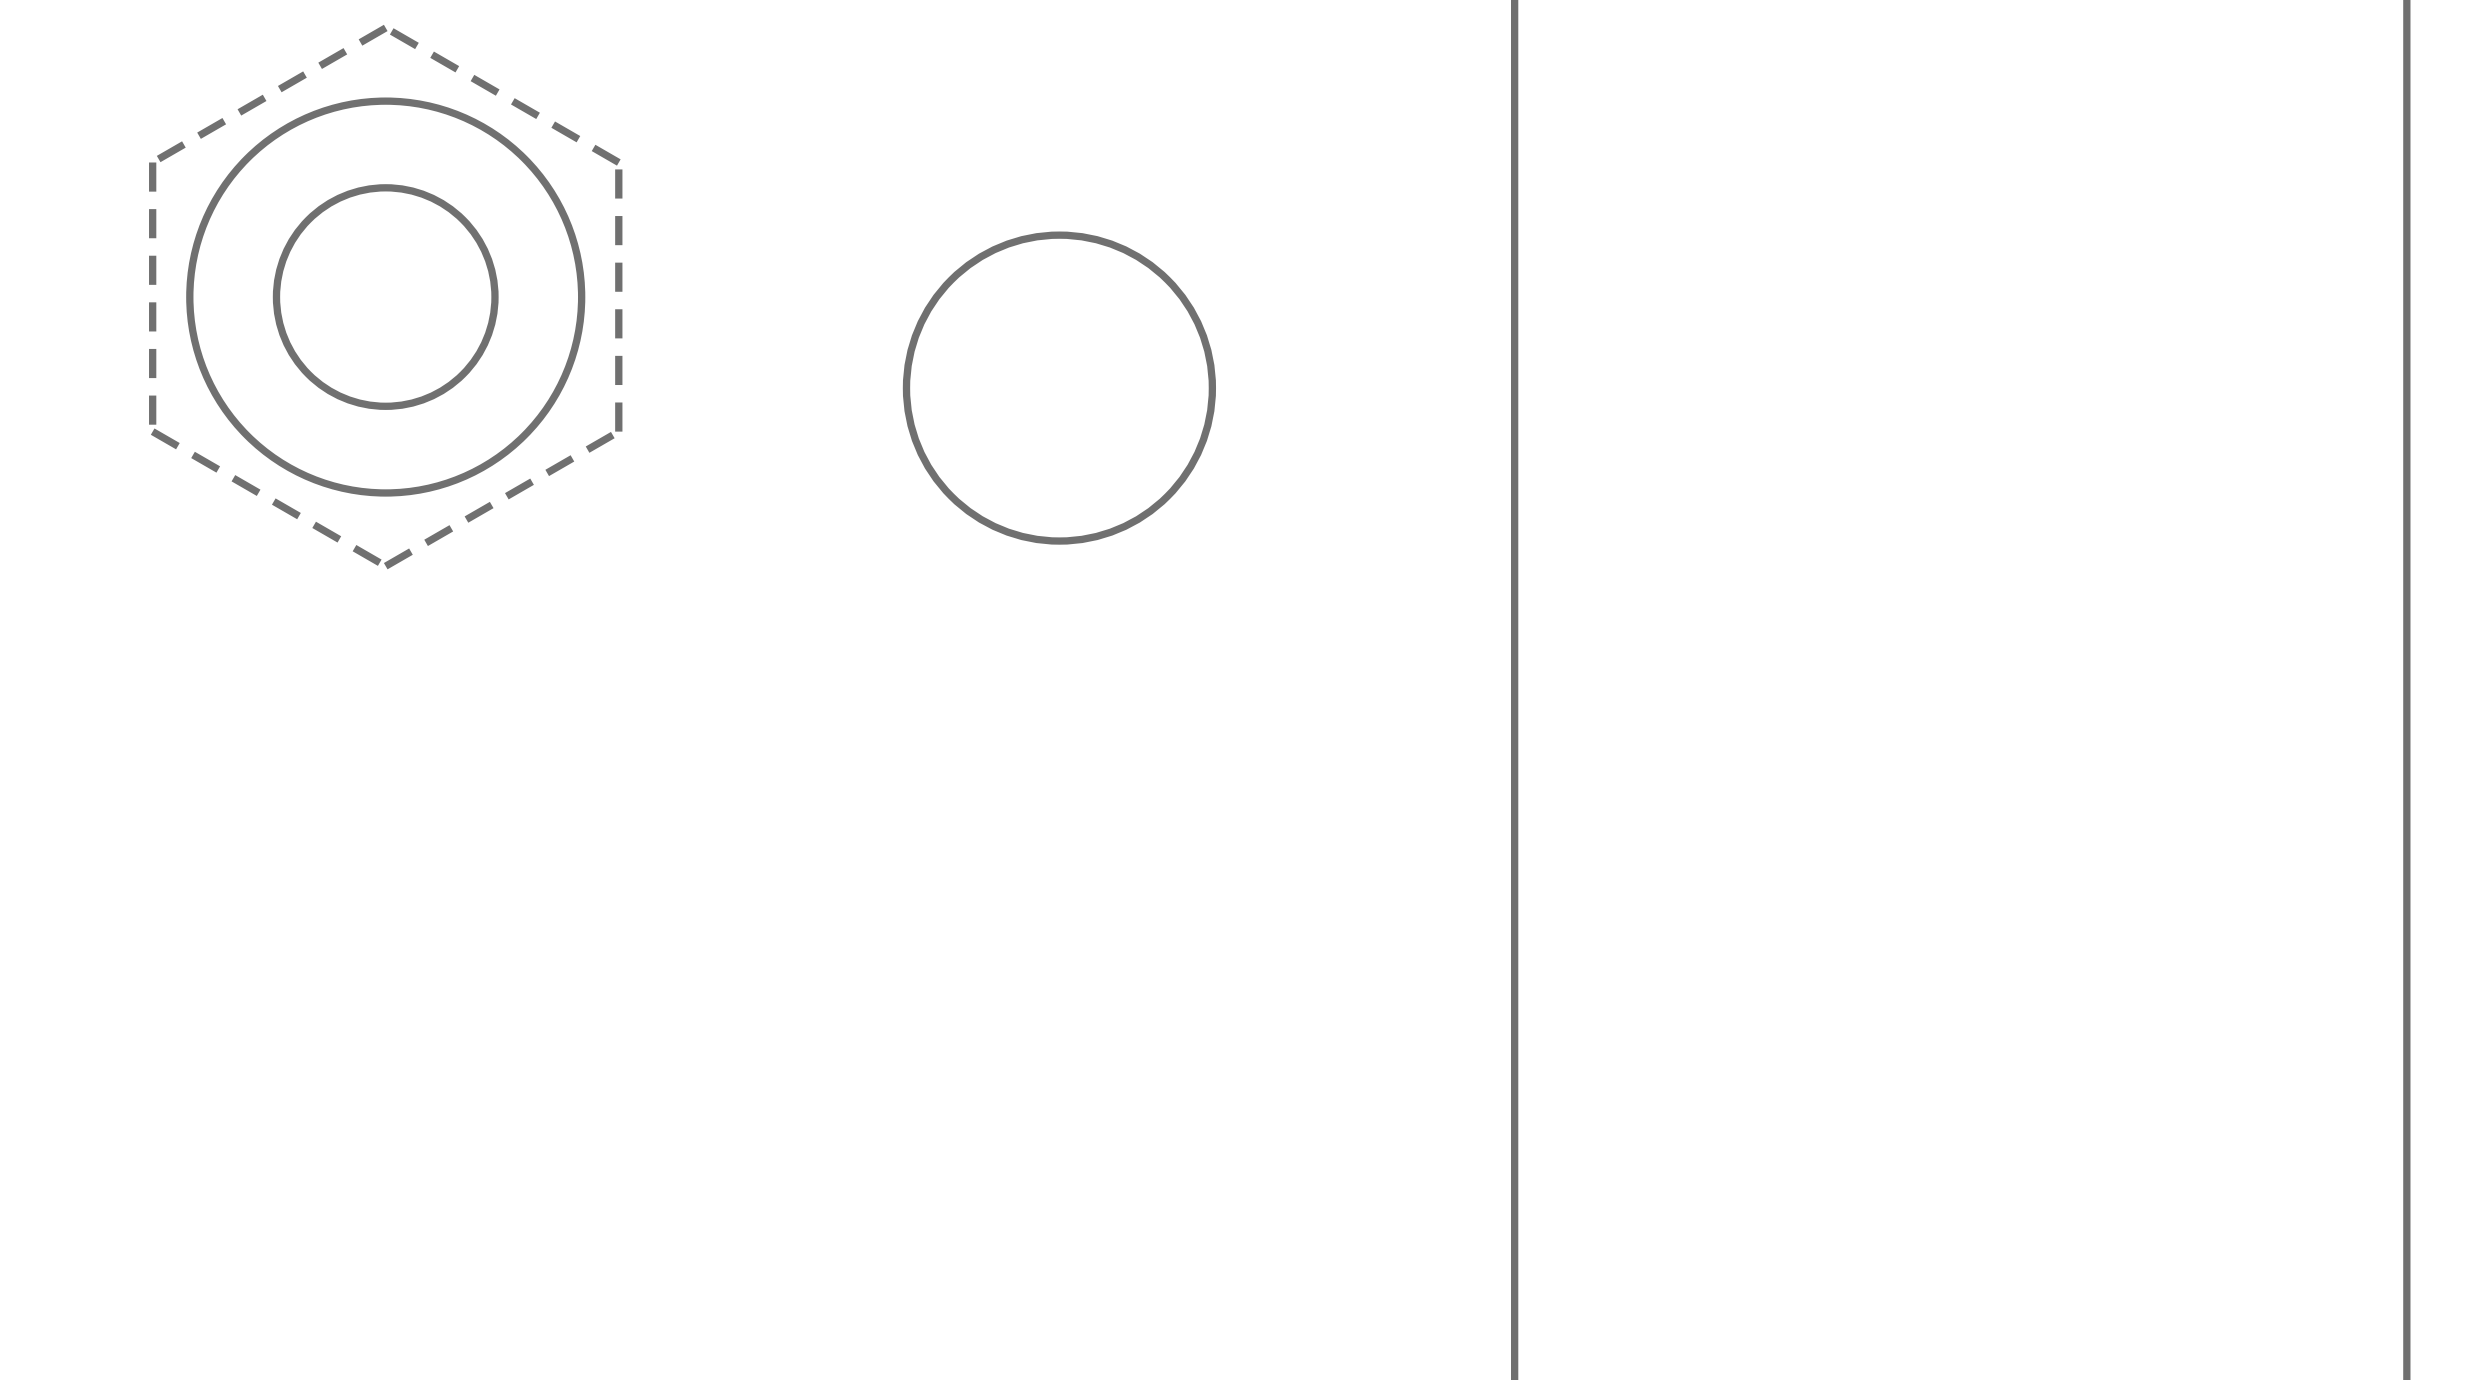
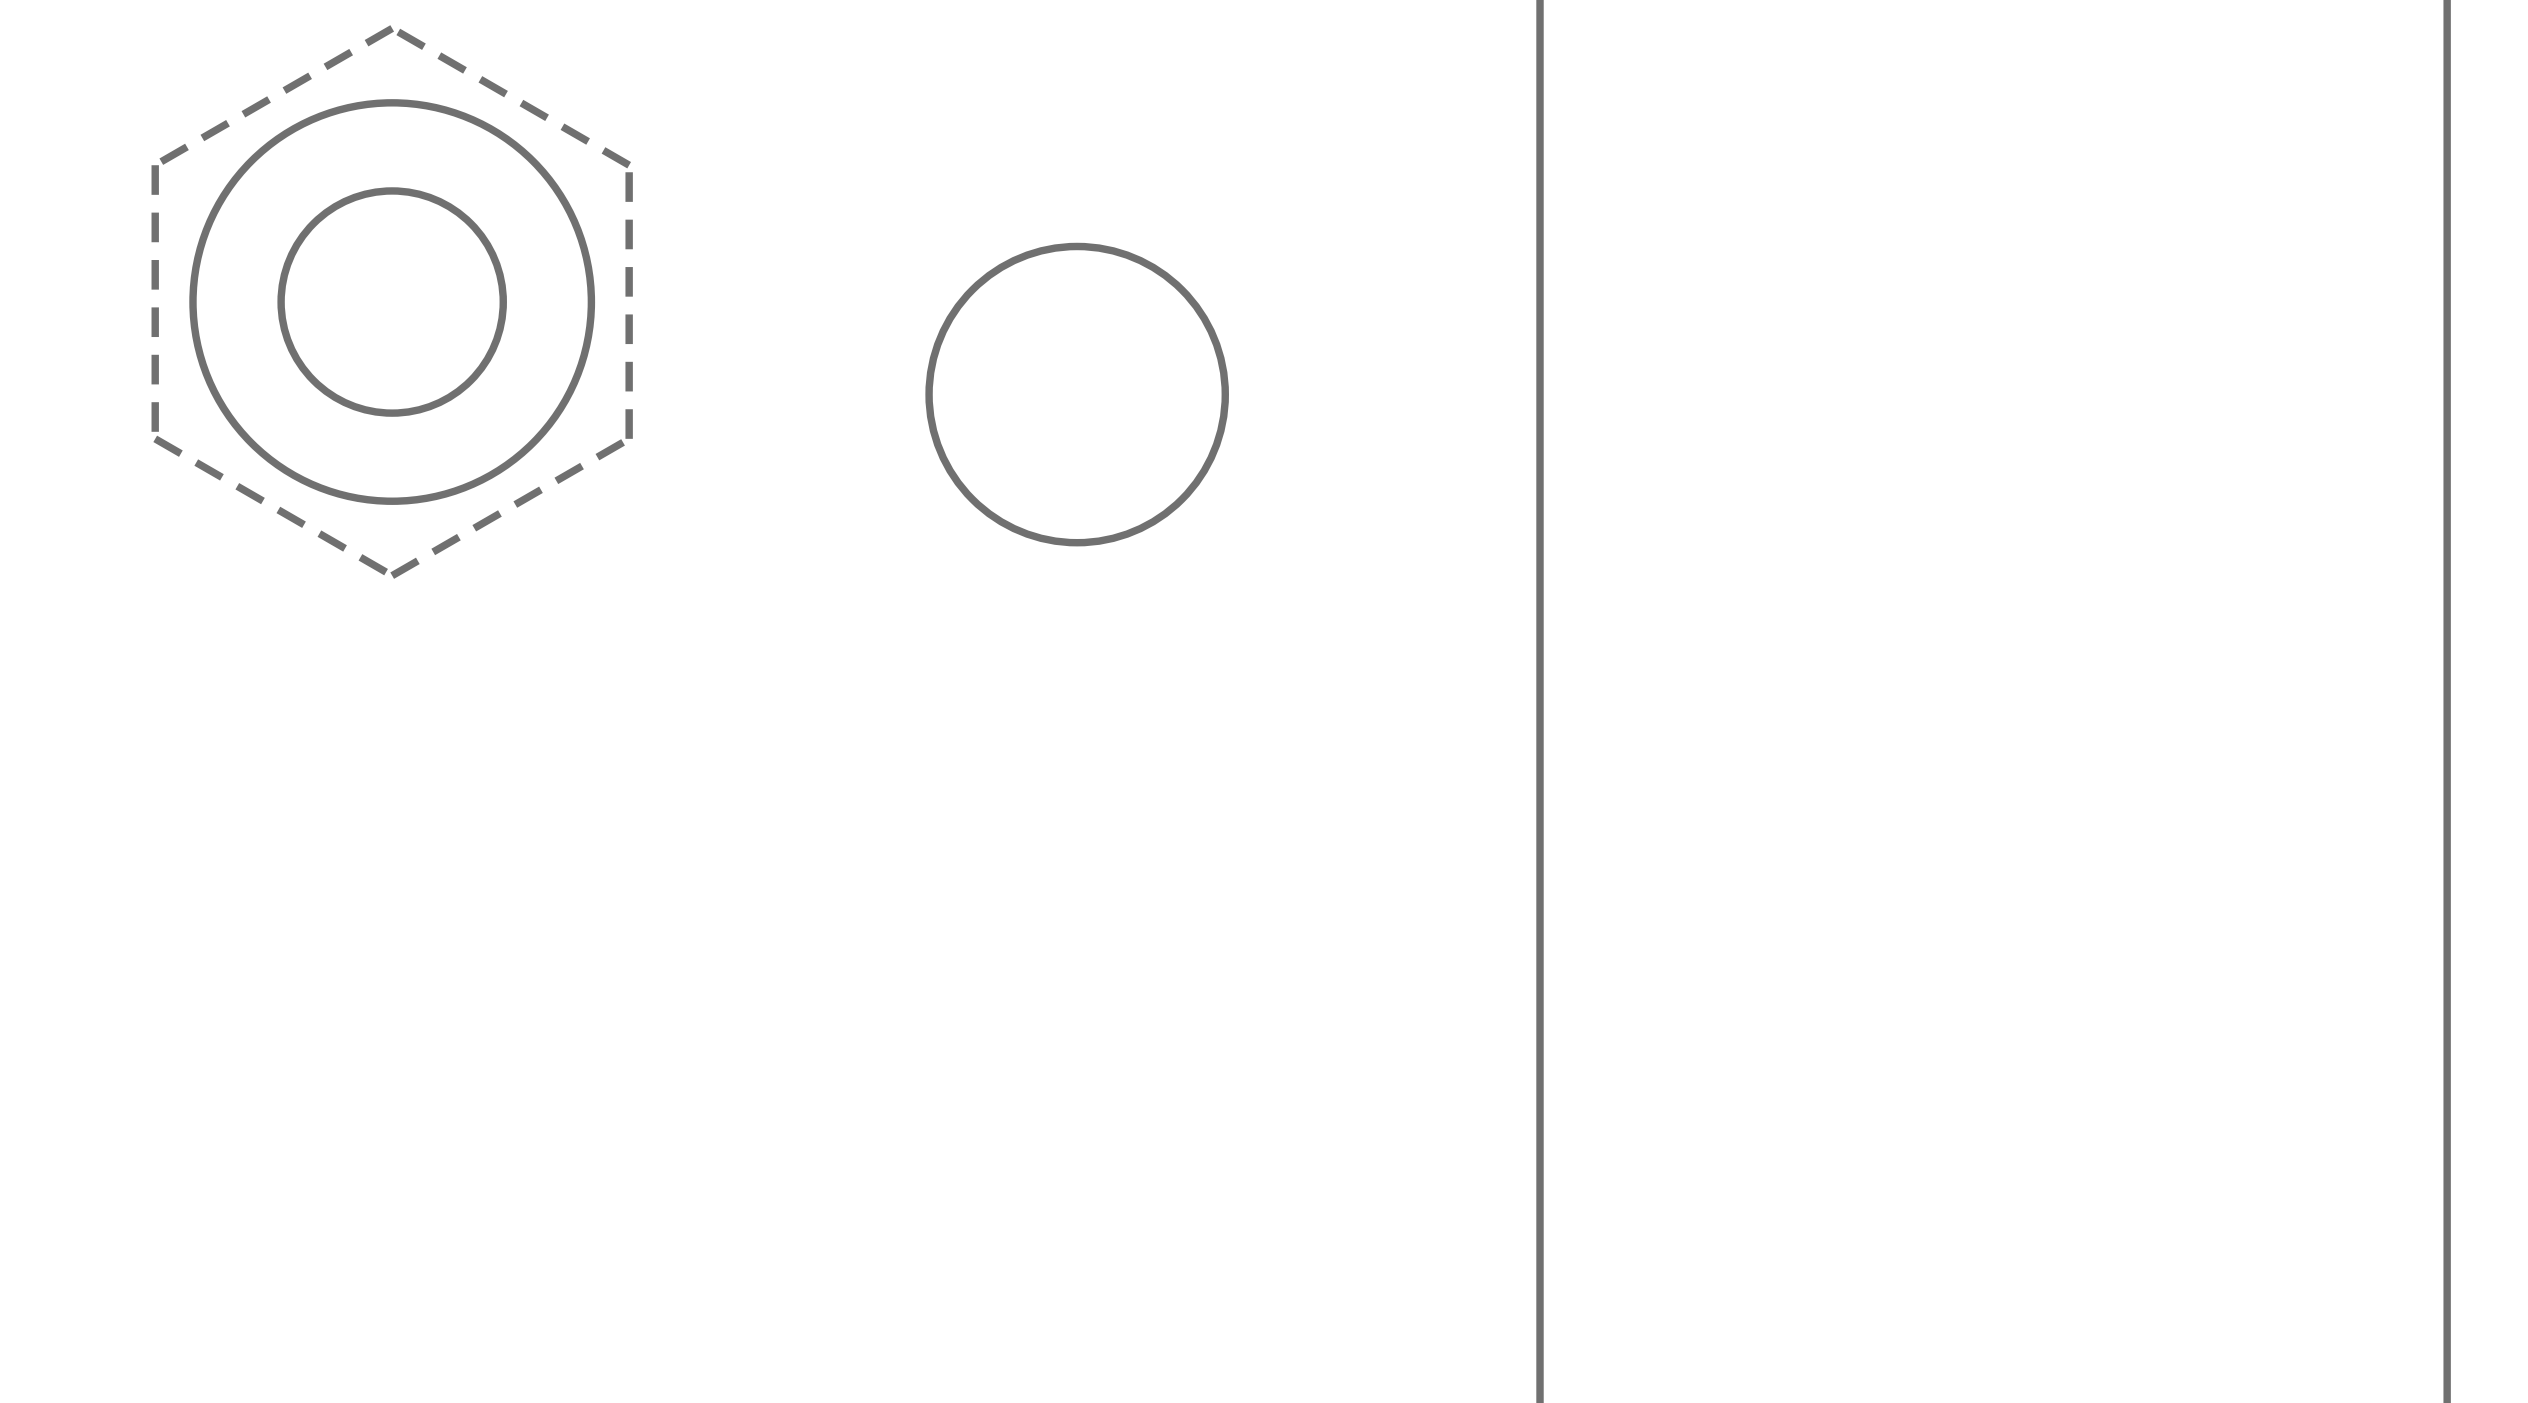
drawing shape: [902, 231, 1217, 545] -> [925, 242, 1229, 547]

